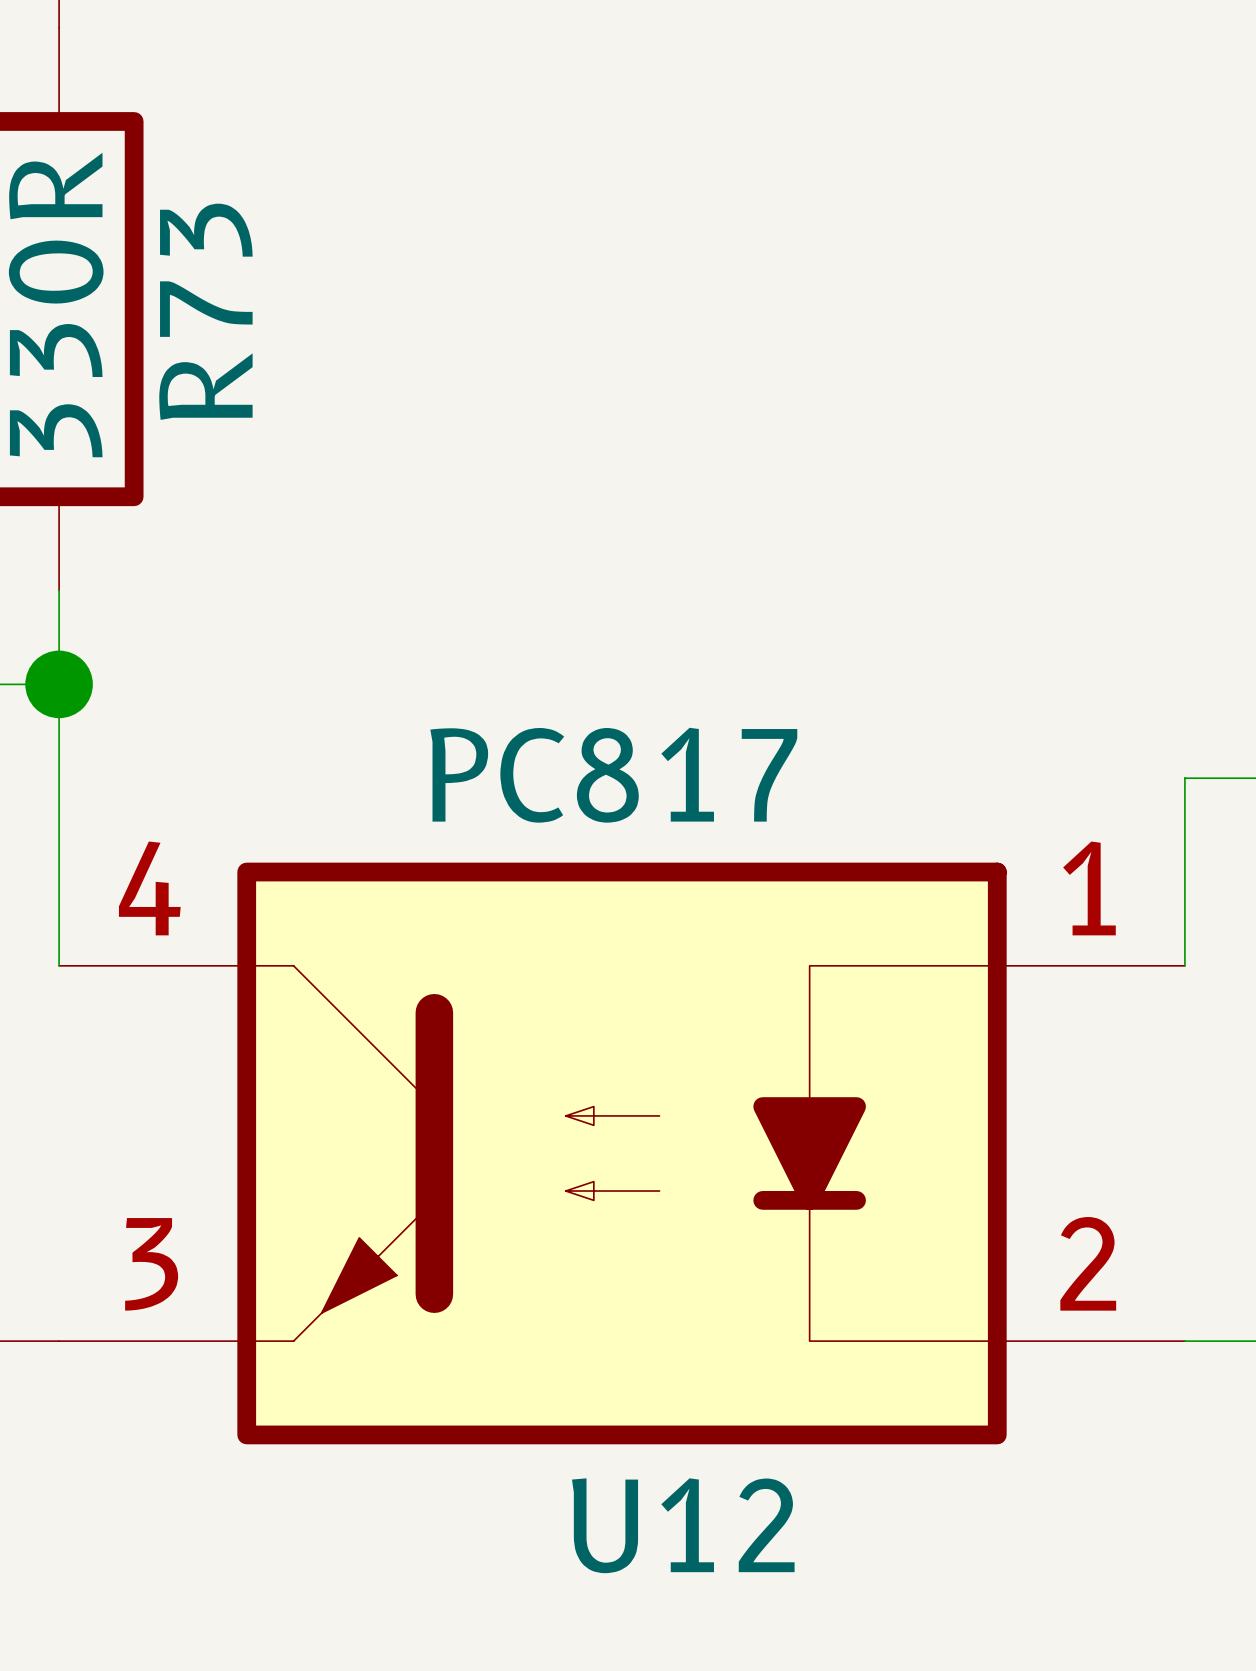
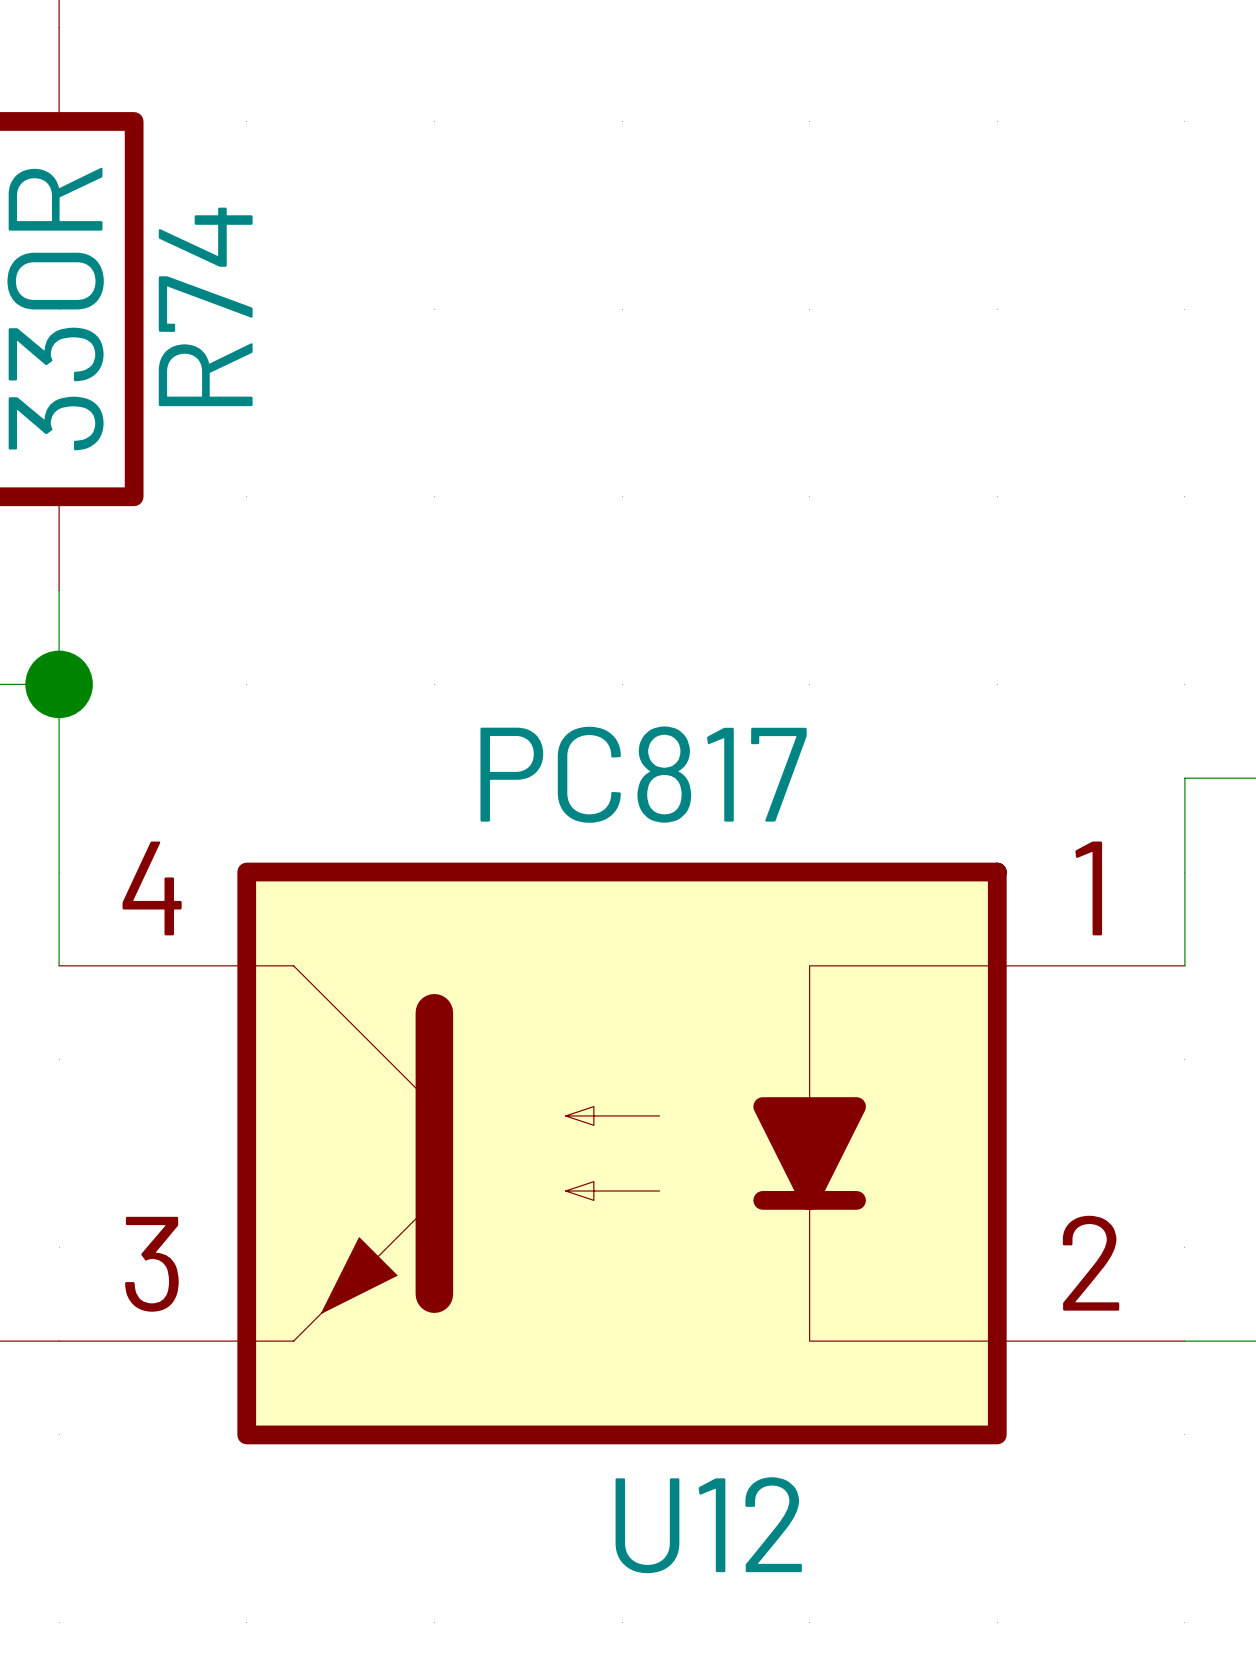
R73 name: R73 (205, 311) -> R74 (205, 306)

